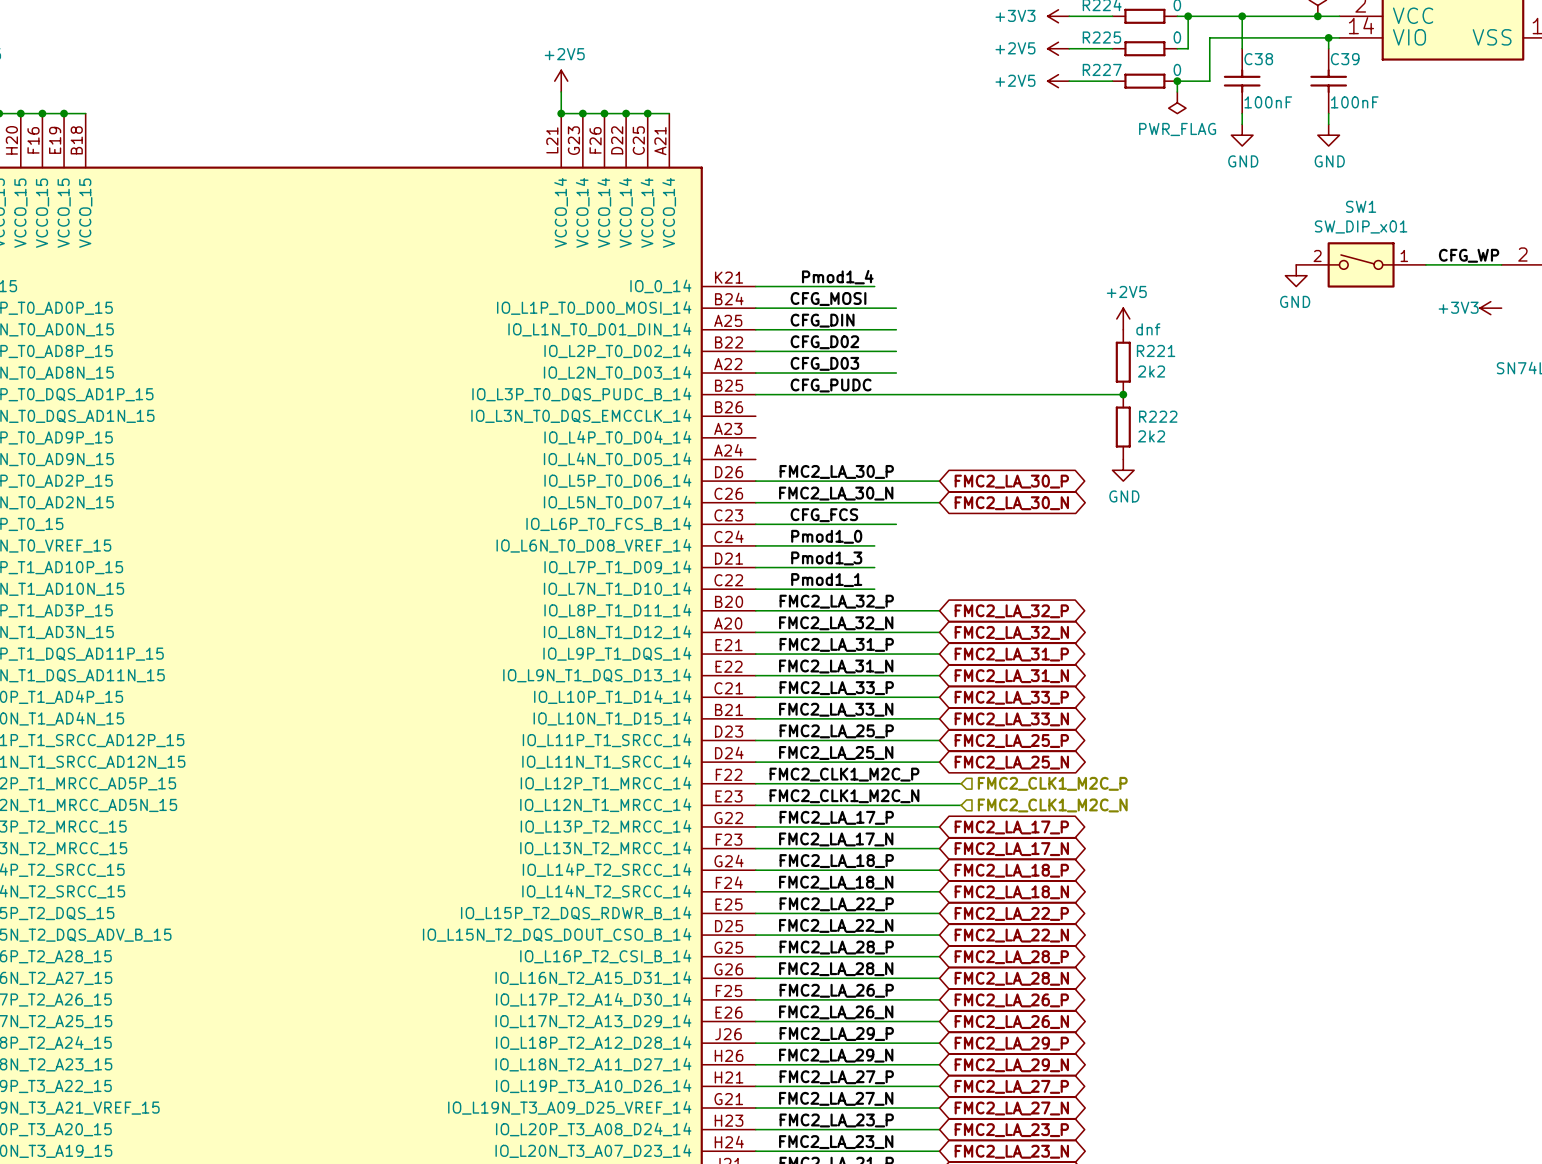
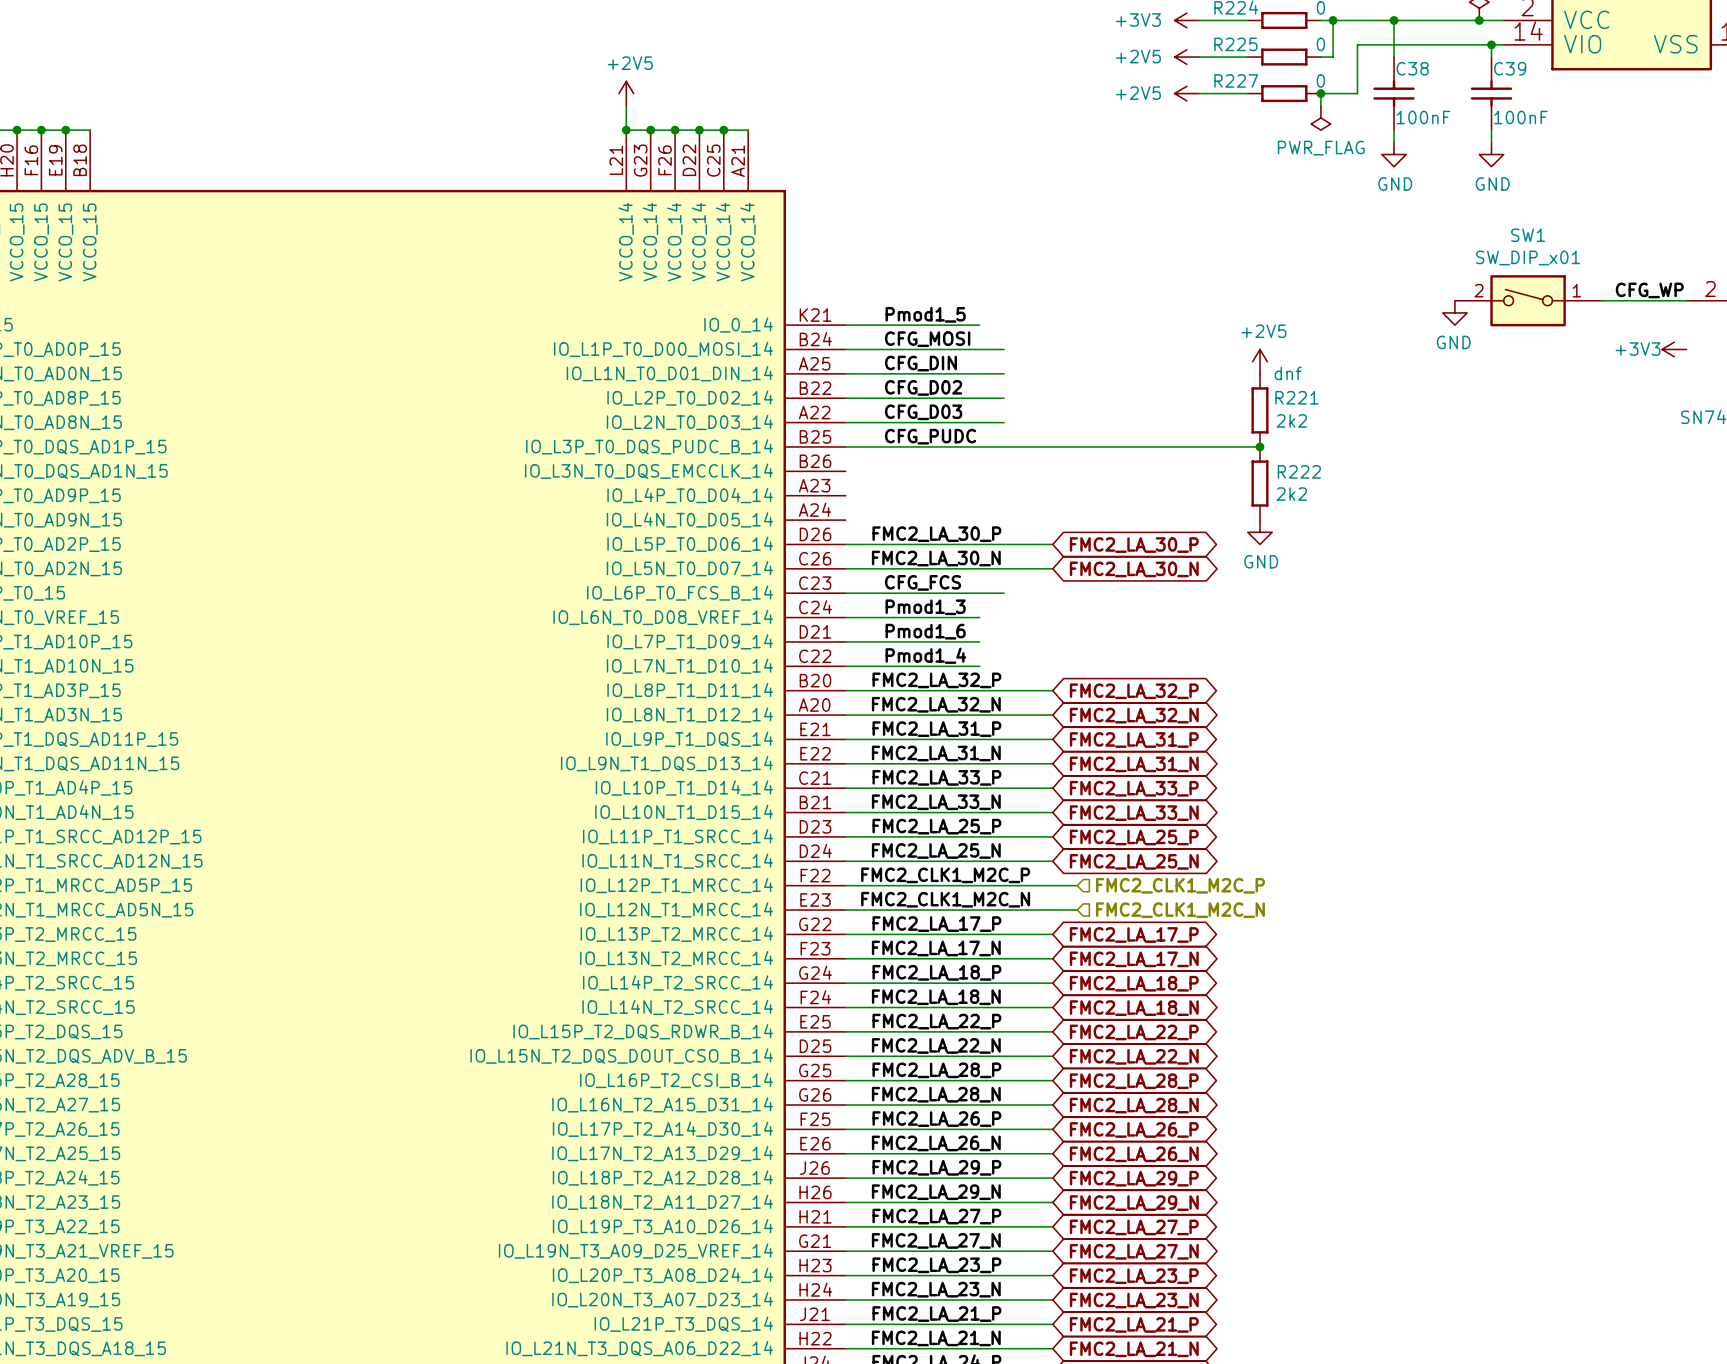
label: Pmod1_4 (837, 277) -> Pmod1_5 (925, 314)
label: Pmod1_0 (826, 536) -> Pmod1_3 (925, 607)
label: Pmod1_3 (826, 558) -> Pmod1_6 (925, 631)
label: Pmod1_1 (826, 580) -> Pmod1_4 (925, 655)

